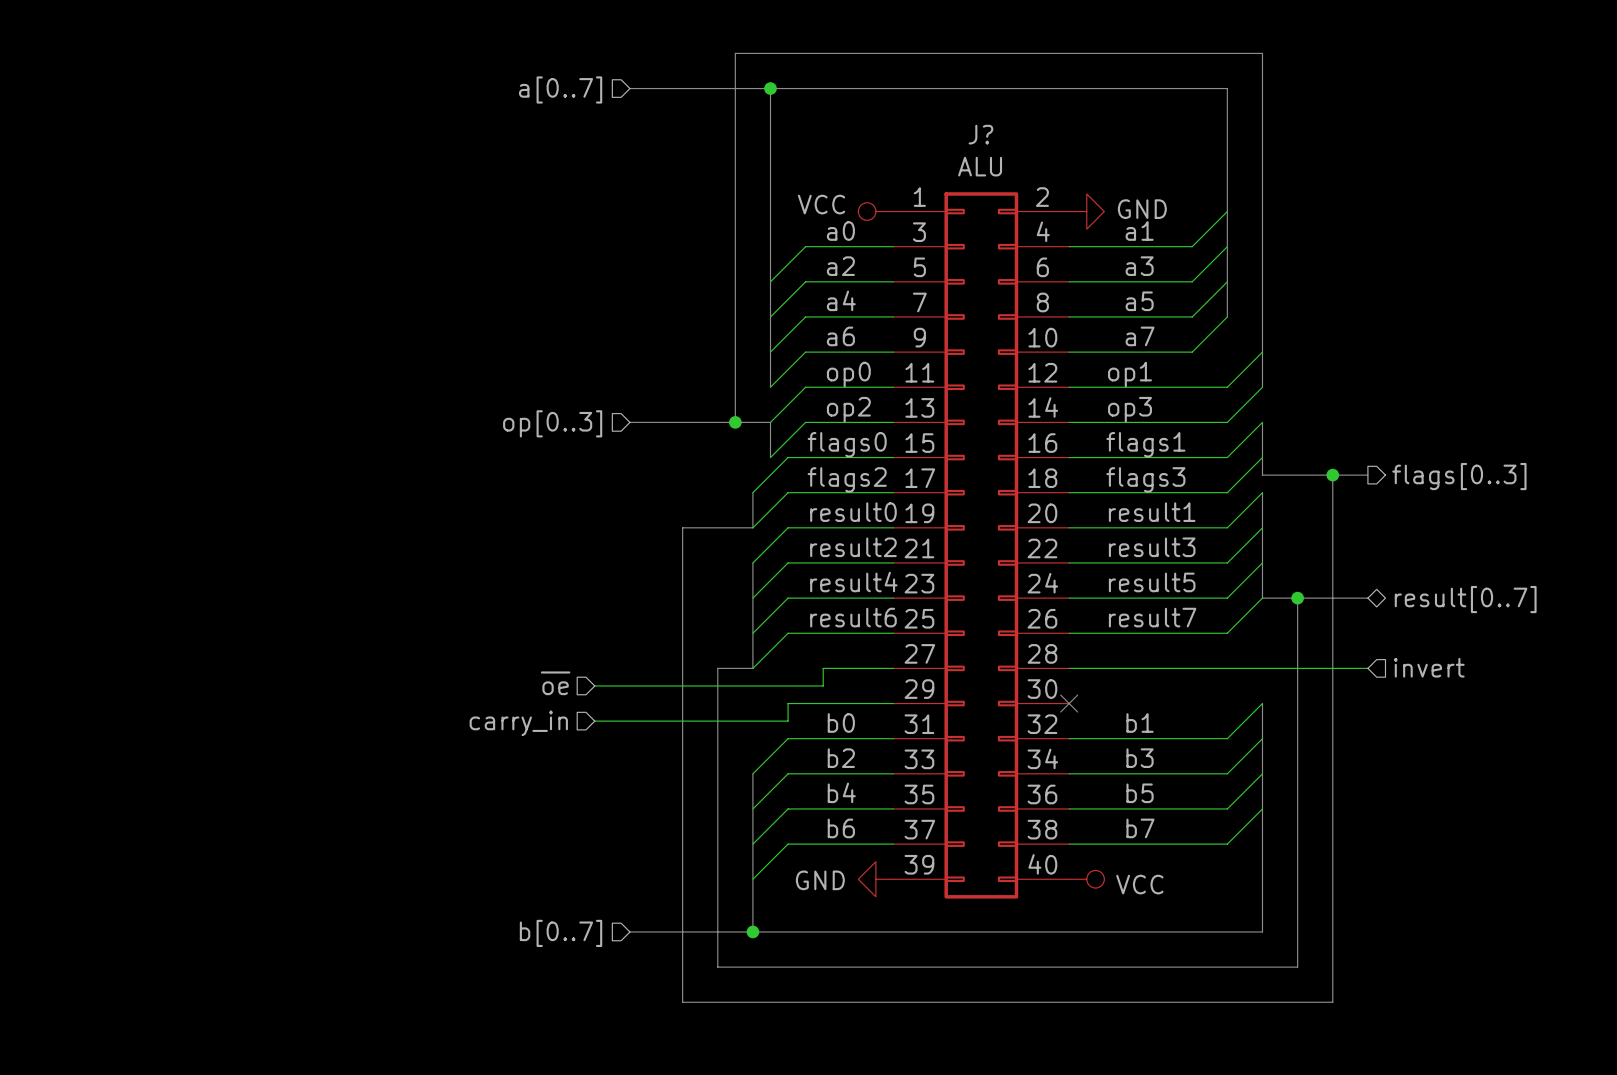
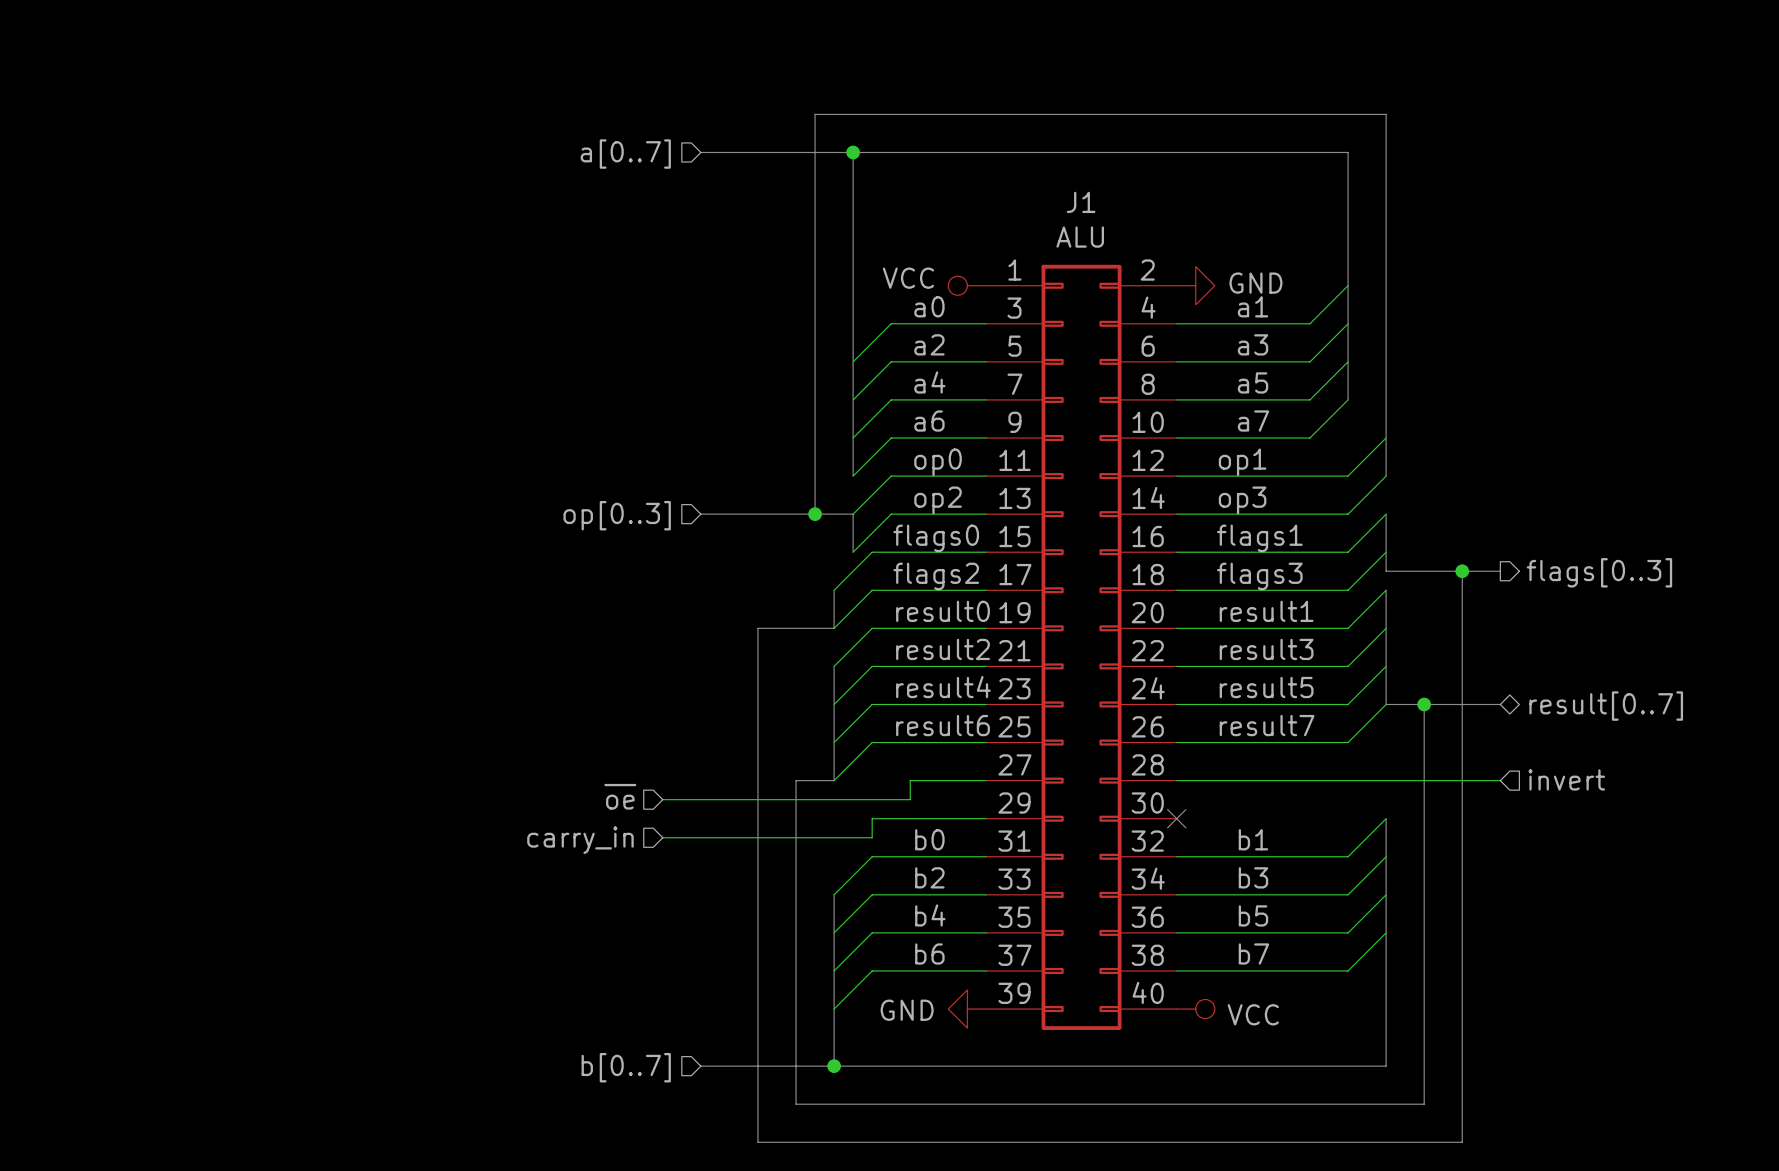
J? name: J? (980, 134) -> J1 (1081, 202)

